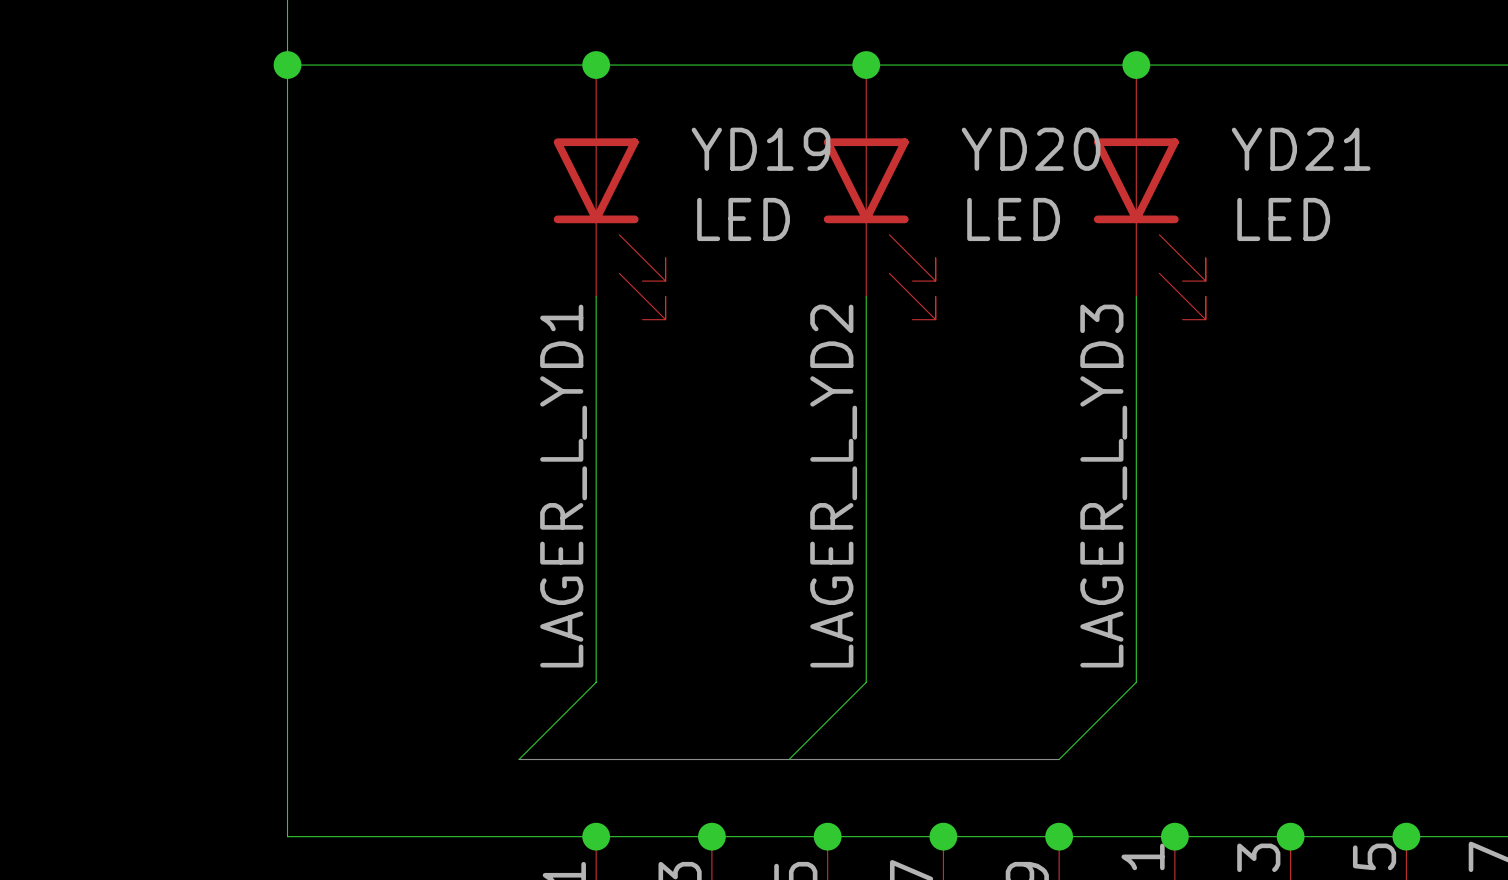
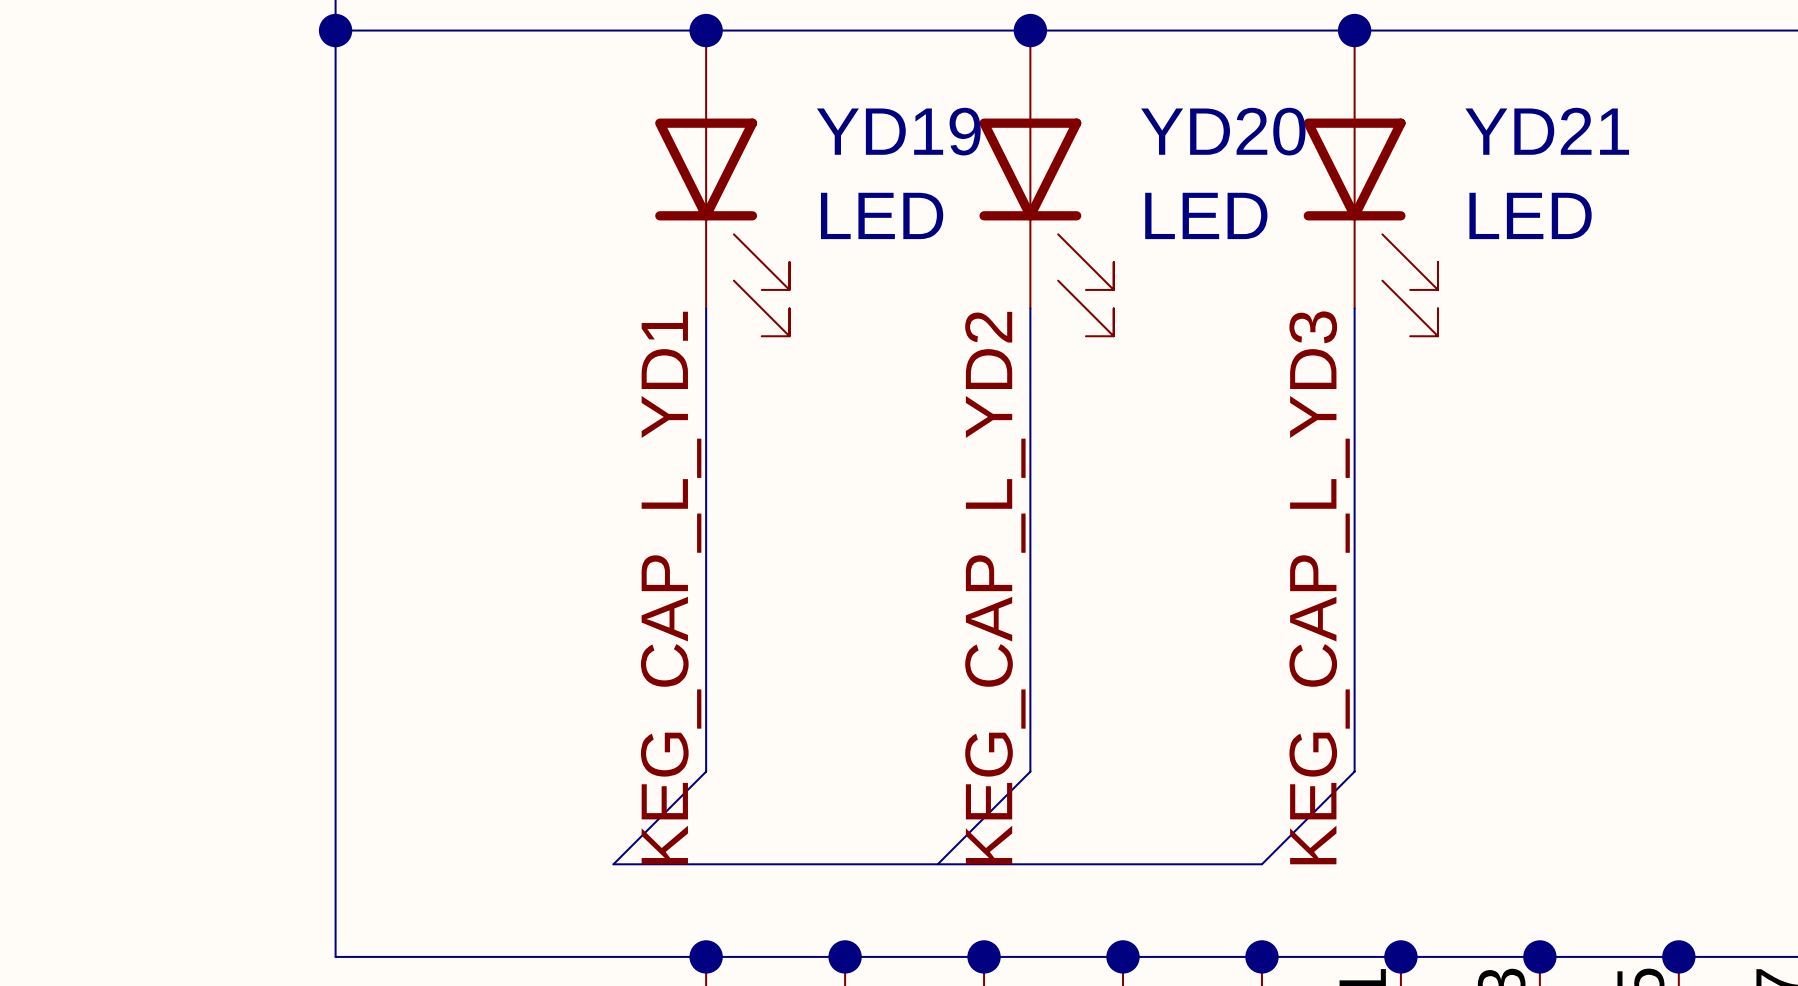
label: LAGER_L_YD1 (563, 486) -> KEG_CAP_L_YD1 (671, 588)
label: LAGER_L_YD2 (833, 486) -> KEG_CAP_L_YD2 (995, 588)
label: LAGER_L_YD3 (1103, 486) -> KEG_CAP_L_YD3 (1319, 587)

